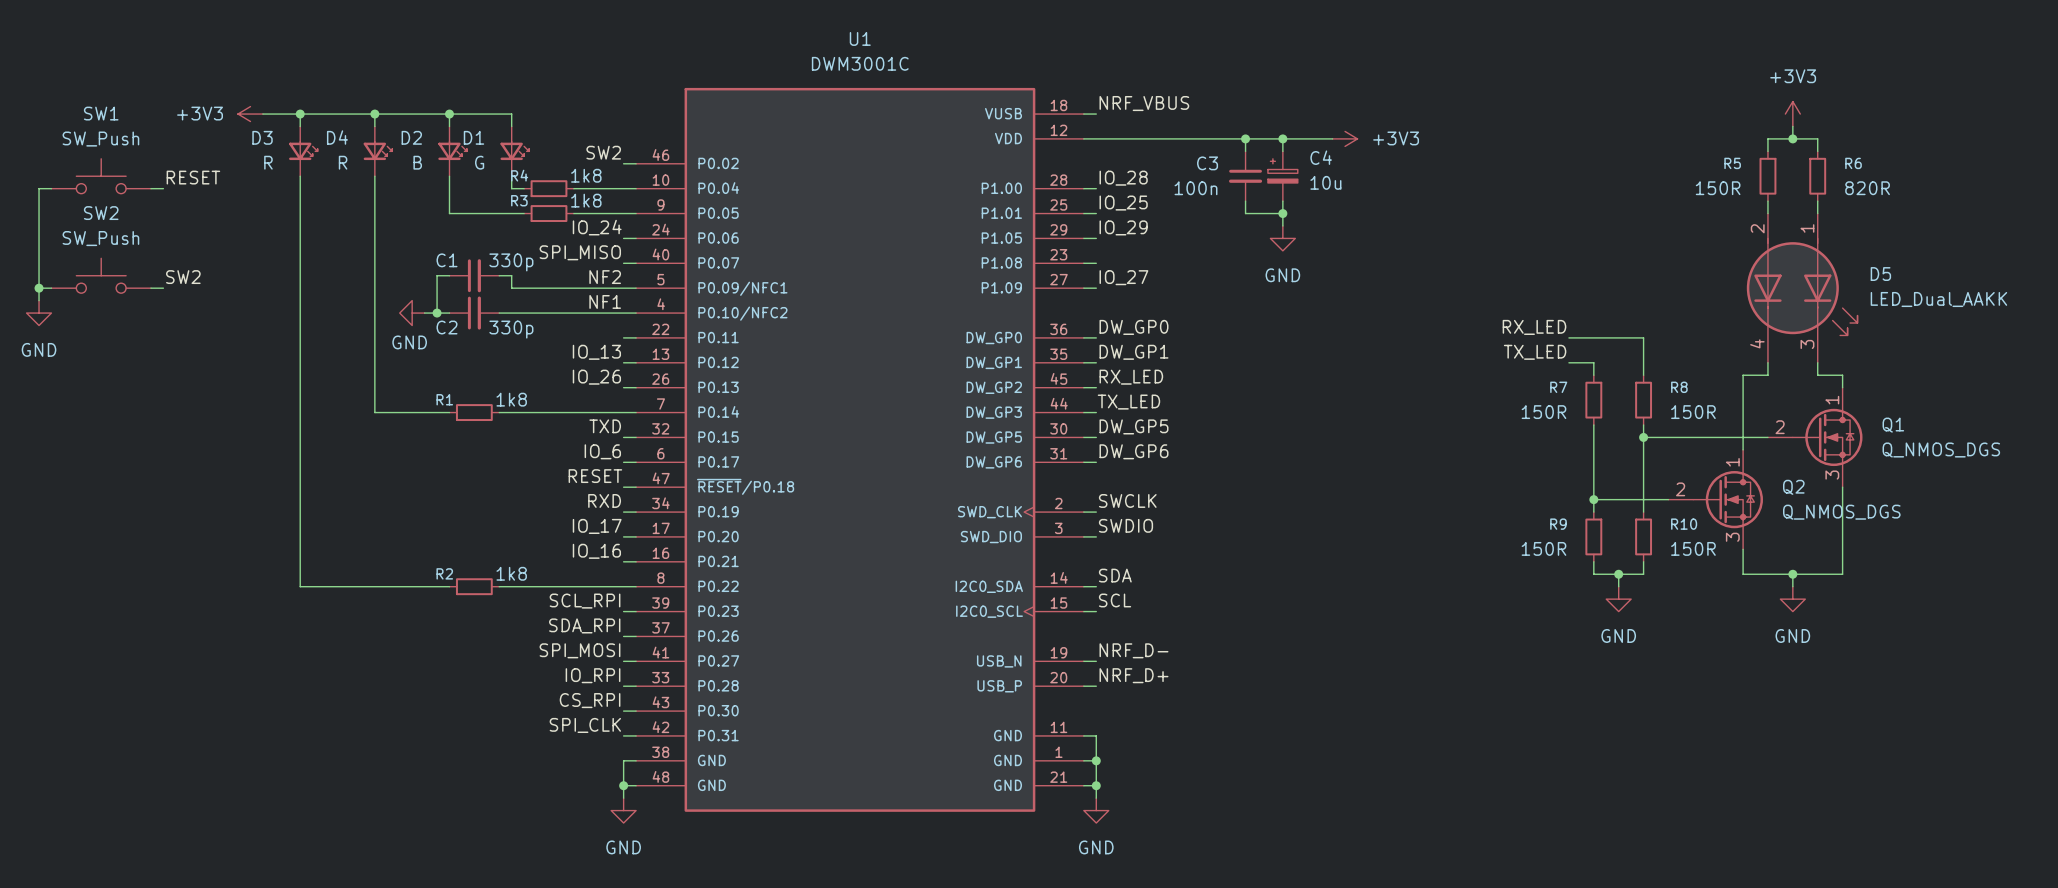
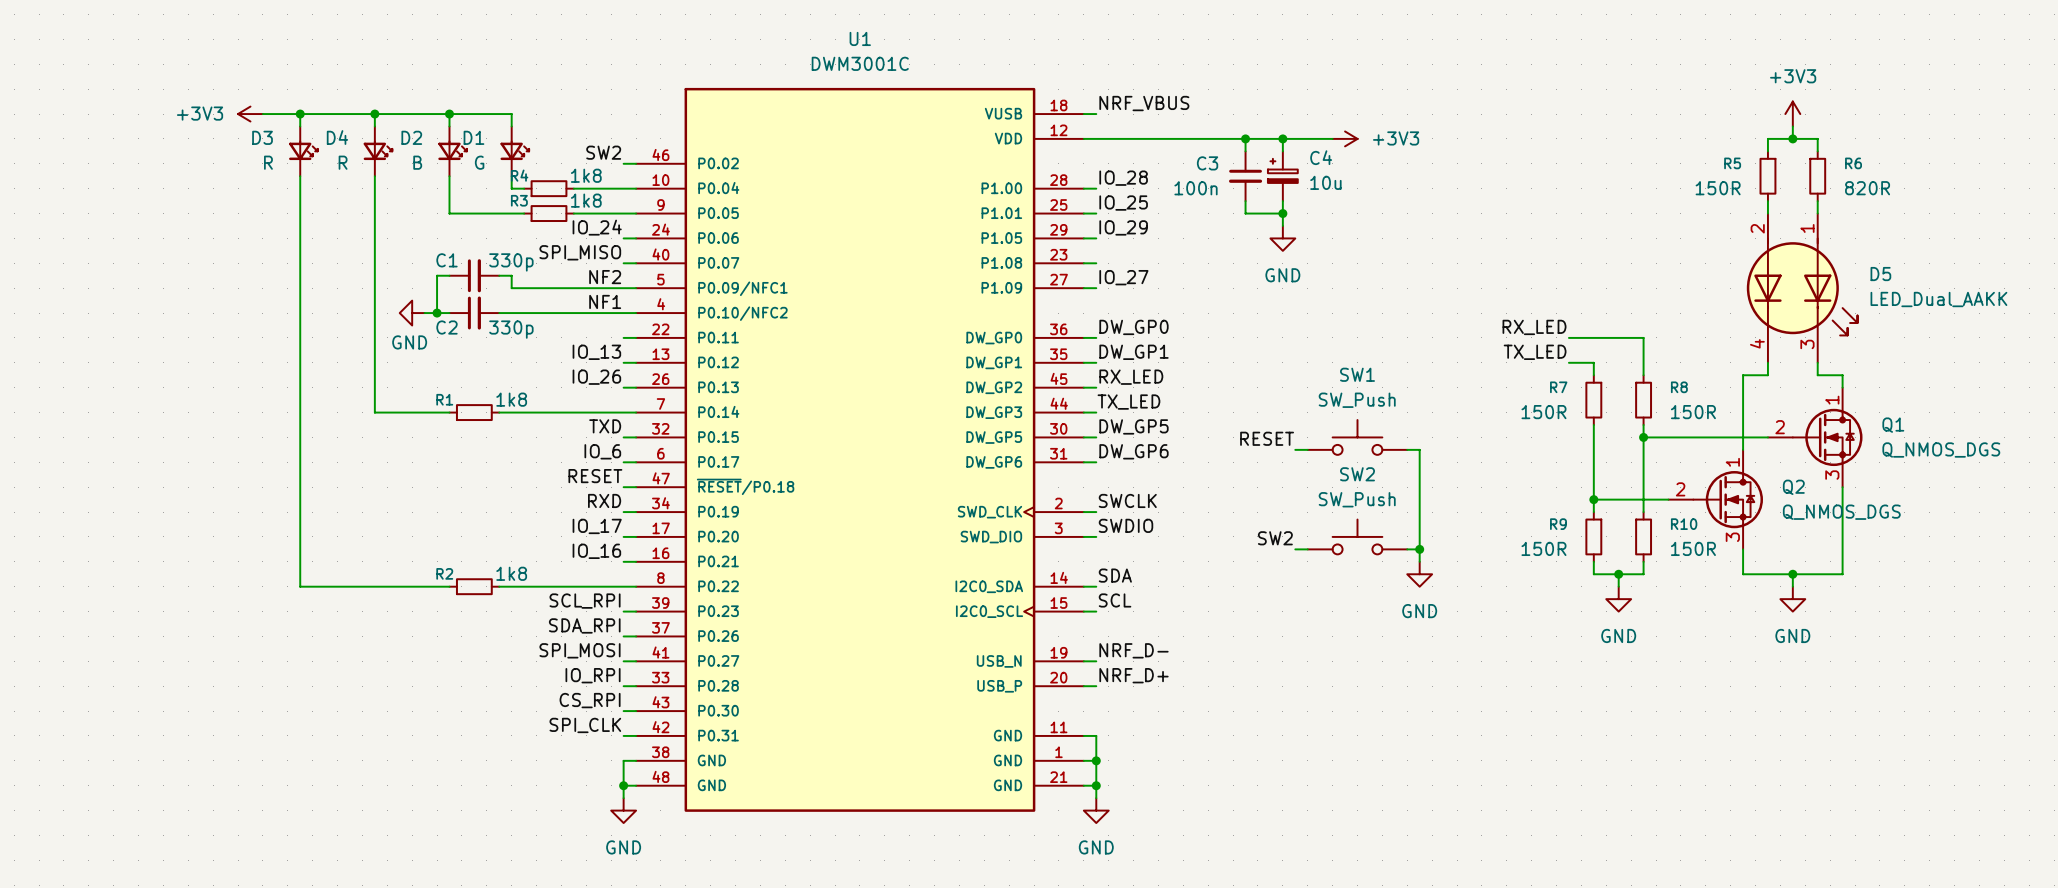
SW1 position: (101, 176) -> (1357, 437)
label: RESET (193, 177) -> none
wire: (51, 188) (39, 188) (39, 300) -> none
wire: (150, 188) (163, 188) -> none
SW2 position: (101, 275) -> (1357, 536)
label: SW2 (183, 277) -> none
wire: (39, 288) (51, 288) -> none
junction: (39, 288) -> none
wire: (150, 288) (163, 288) -> none
power symbol: GND (39, 313) -> none
label: none -> RESET (1267, 438)
wire: none -> (1295, 449) (1307, 449)
wire: none -> (1407, 449) (1419, 449) (1419, 561)
label: none -> SW2 (1275, 538)
wire: none -> (1295, 549) (1307, 549)
wire: none -> (1407, 549) (1419, 549)
junction: none -> (1419, 549)
power symbol: none -> GND (1419, 574)

